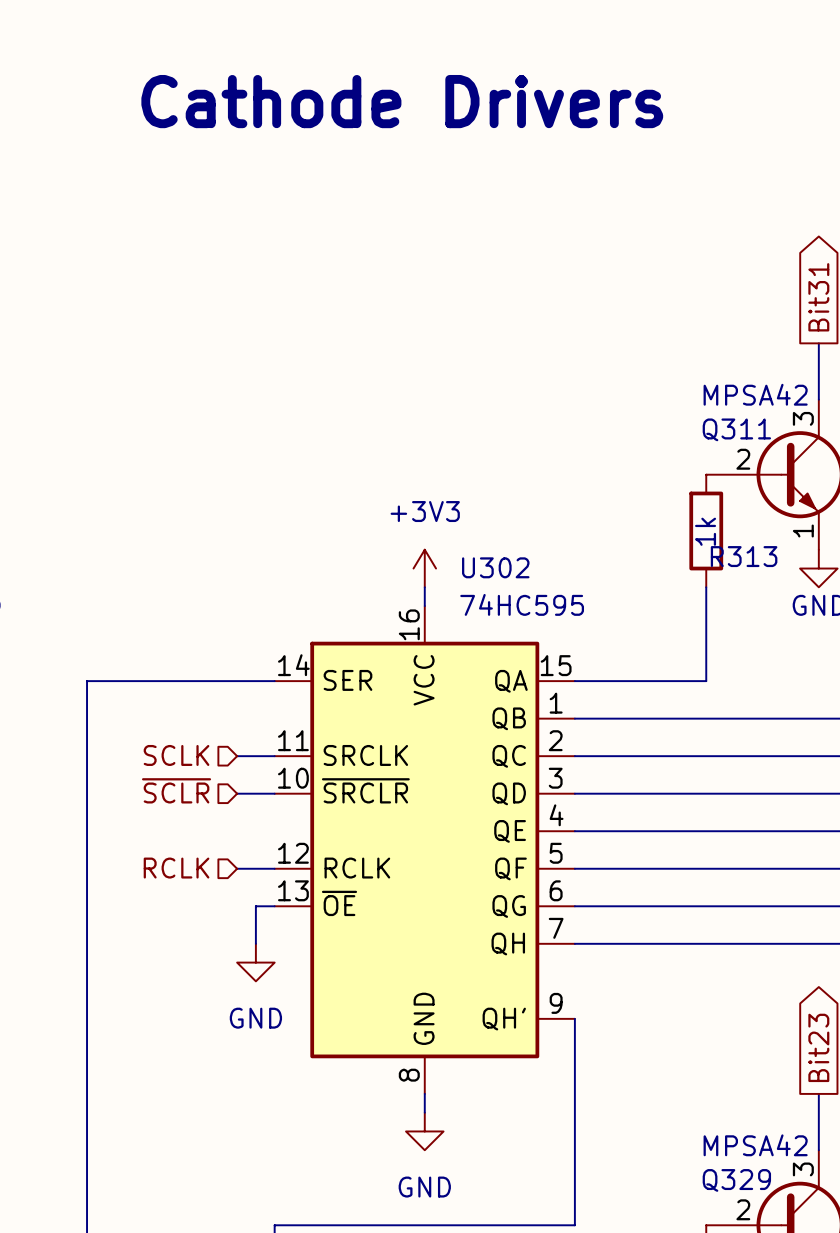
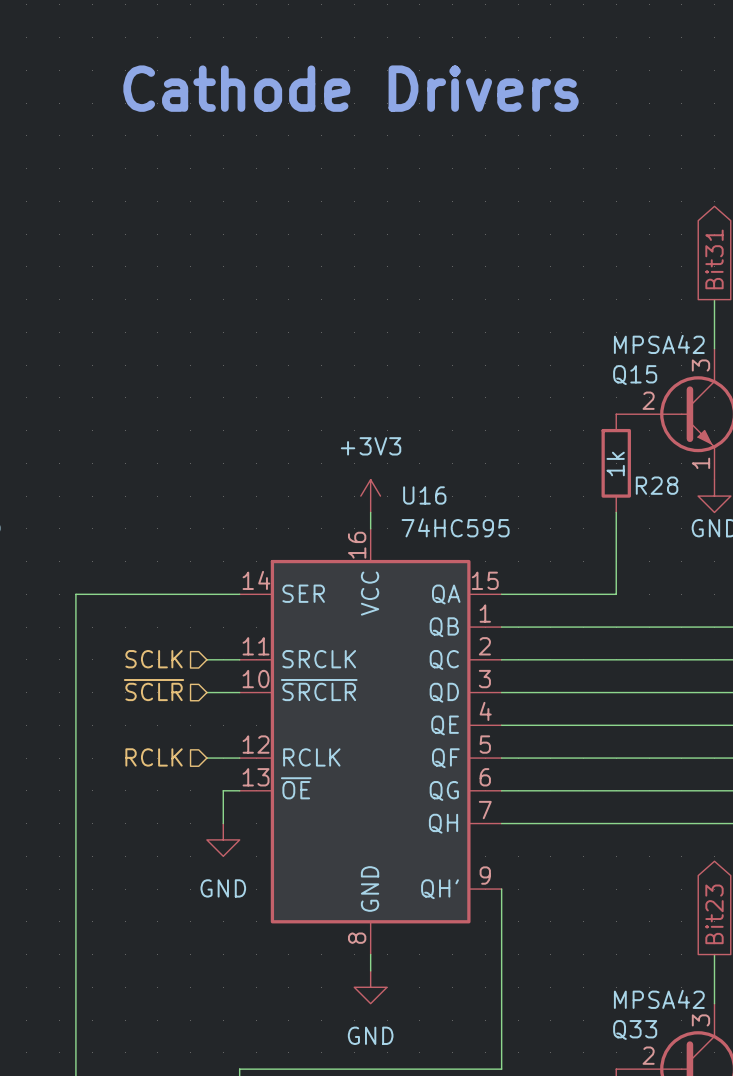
Q311 name: Q311 (736, 429) -> Q15 (635, 375)
R313 name: R313 (744, 556) -> R28 (657, 485)
U302 name: U302 (495, 567) -> U16 (424, 495)
Q329 name: Q329 (736, 1180) -> Q33 (635, 1030)

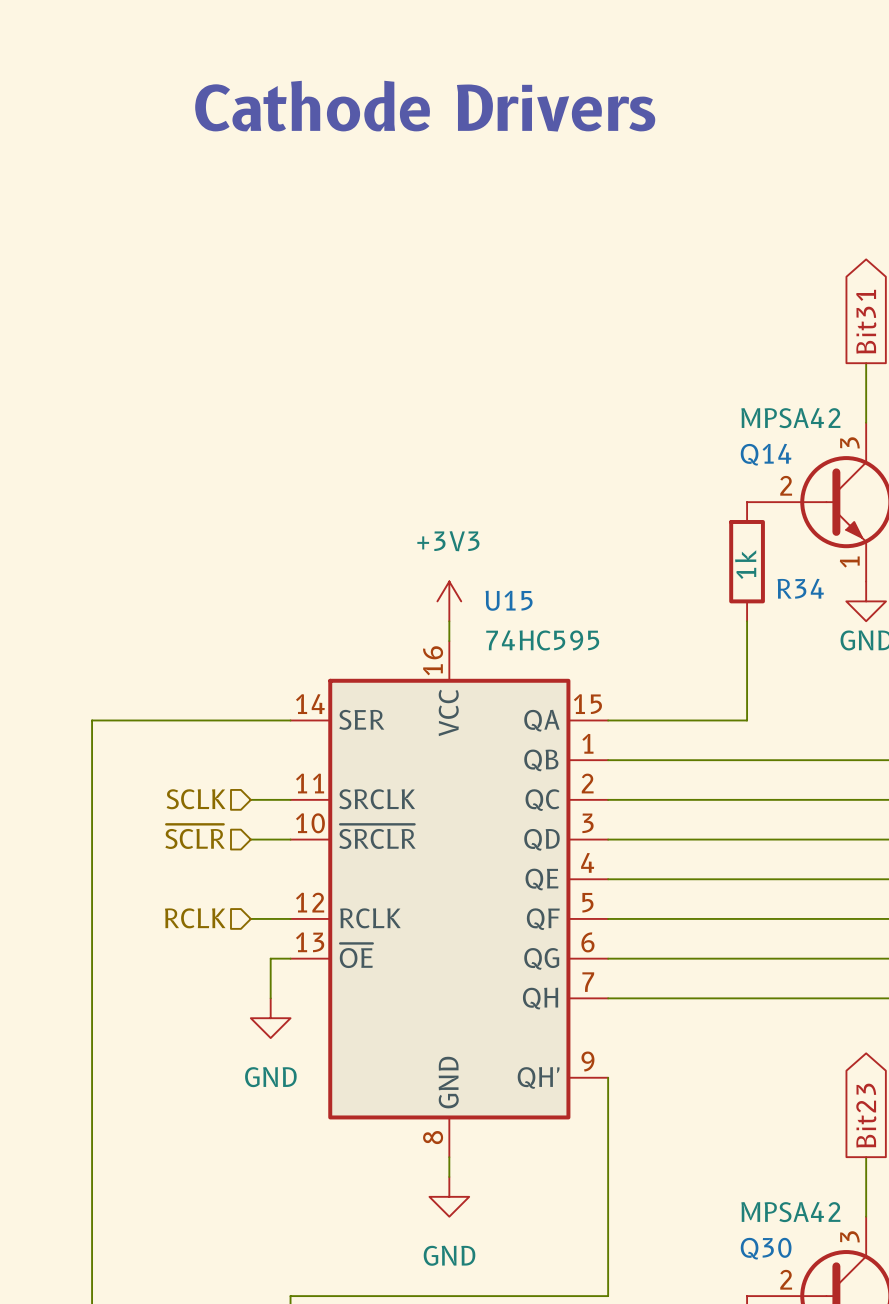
Q15 name: Q15 (635, 375) -> Q14 (766, 454)
R28 name: R28 (657, 485) -> R34 (800, 588)
U16 name: U16 (424, 495) -> U15 (509, 600)
Q33 name: Q33 (635, 1030) -> Q30 (766, 1248)

